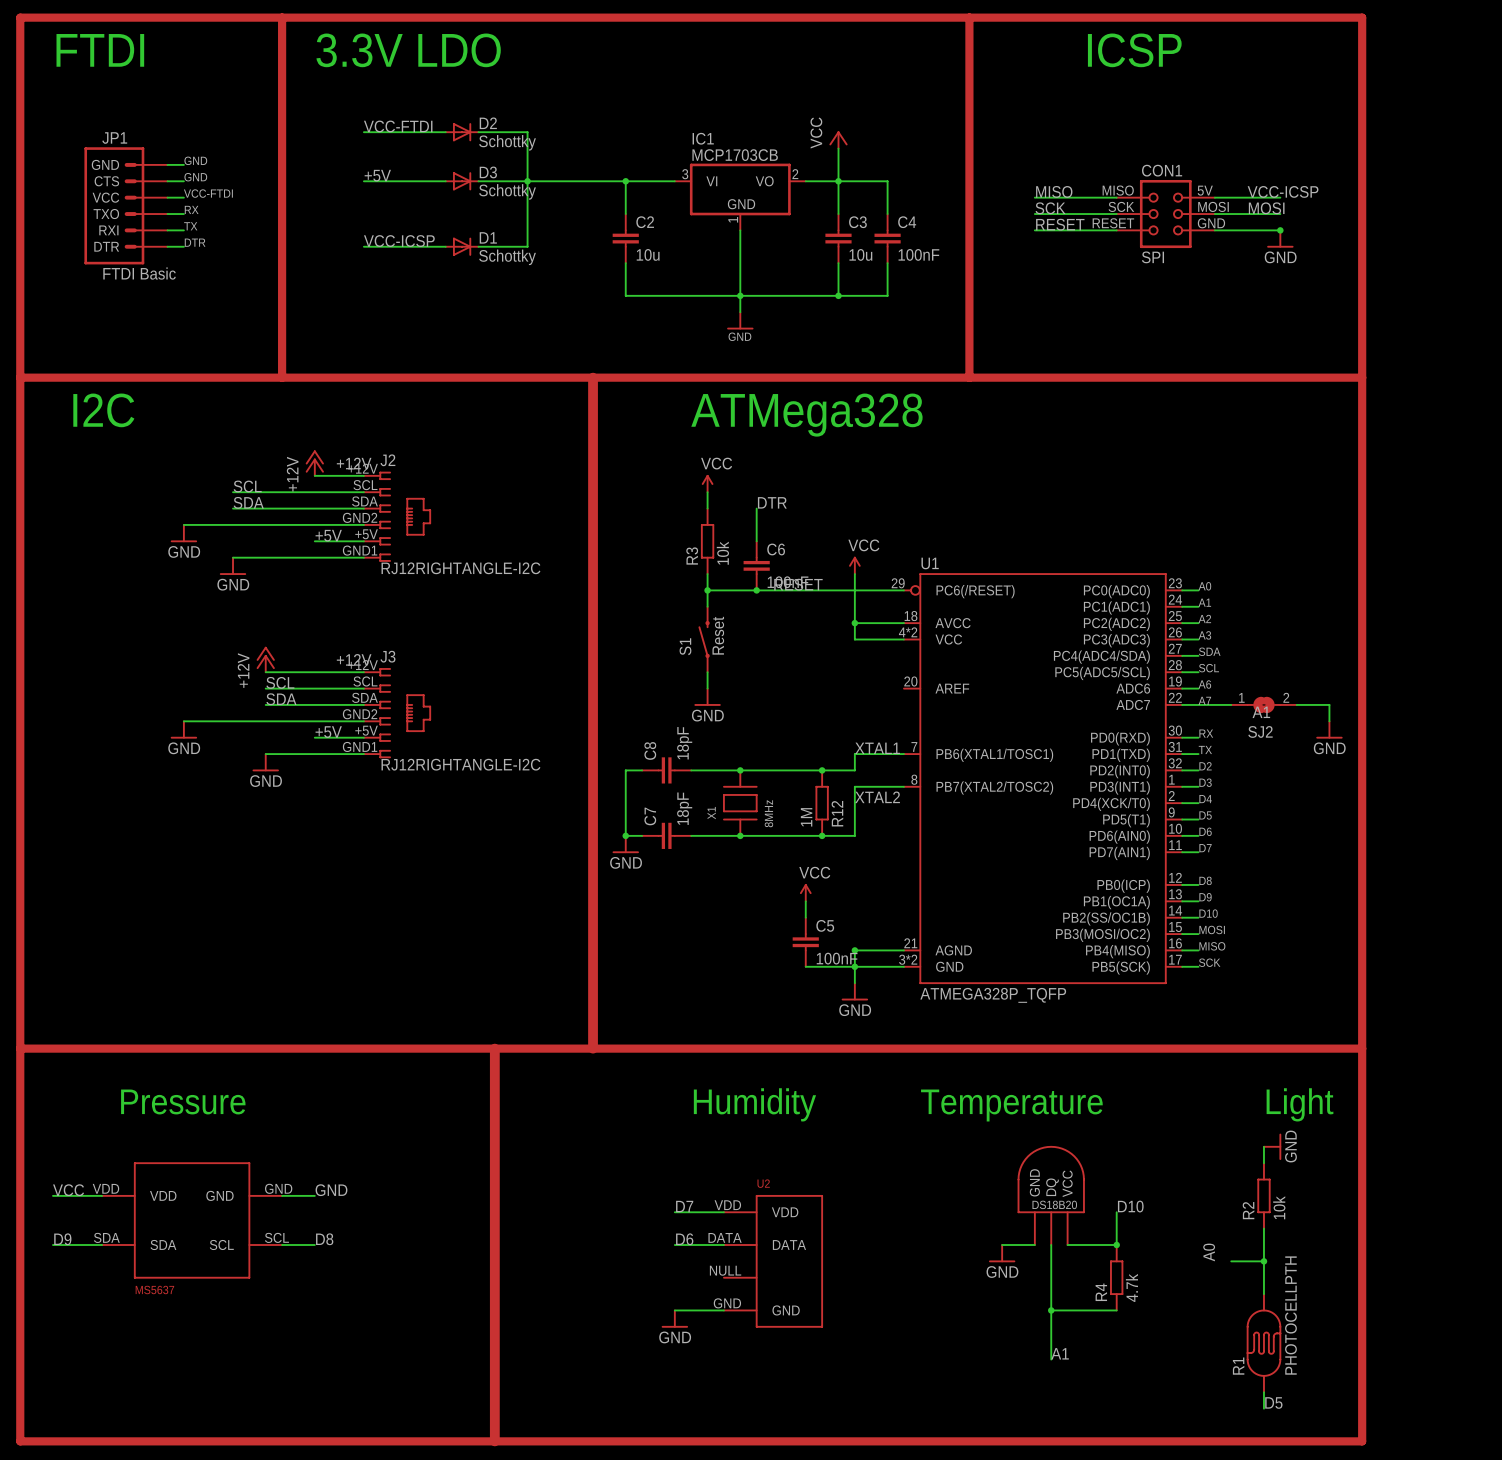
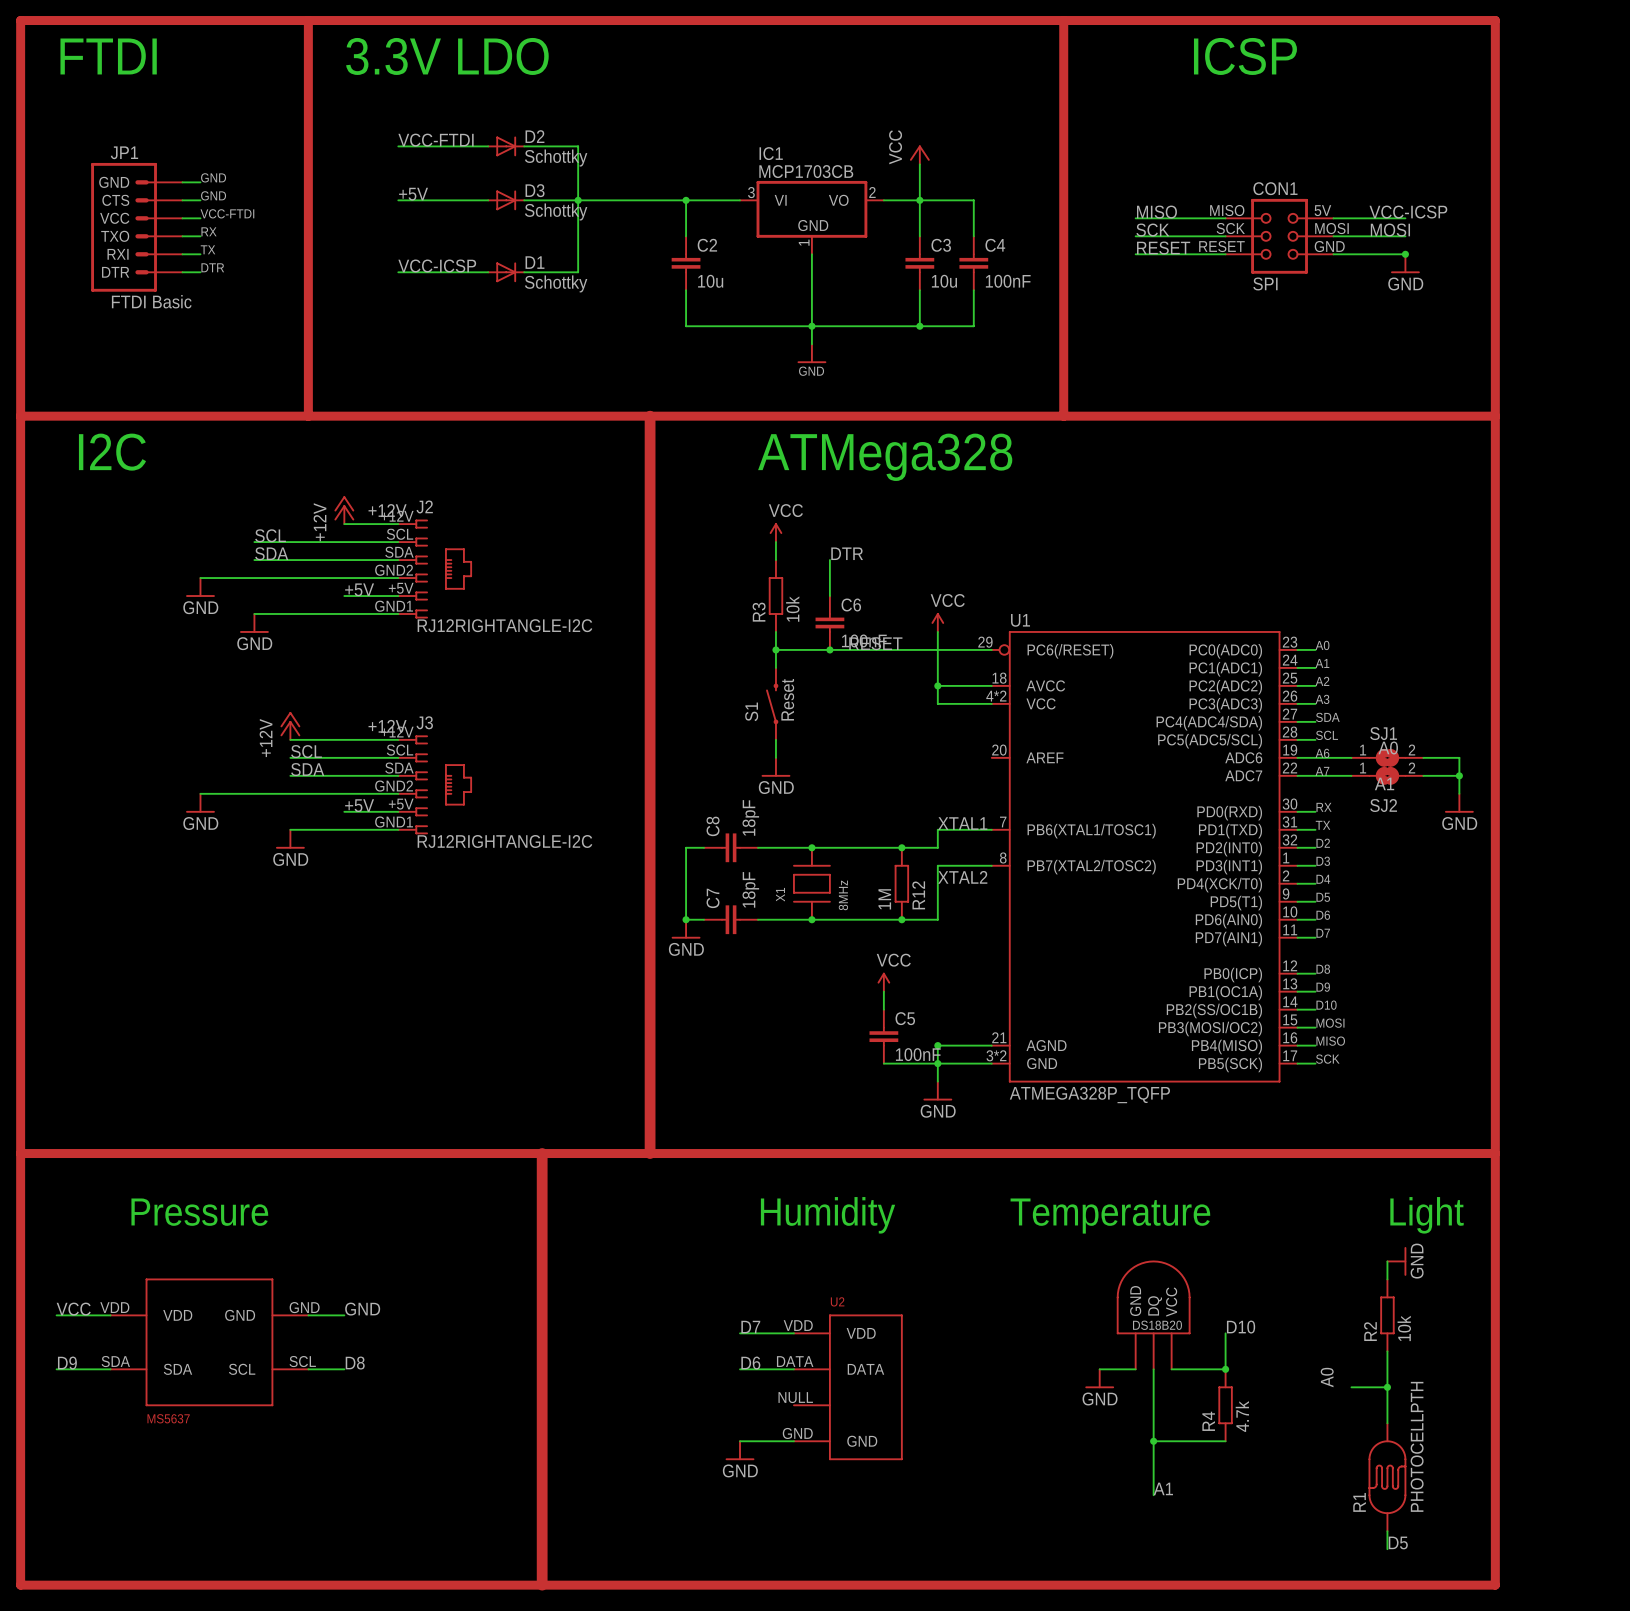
wire: none -> (1315, 757) (1351, 757)
SJ1: none -> A0 (1387, 757)
wire: none -> (1423, 757) (1459, 757) (1459, 775)
junction: none -> (1459, 775)

